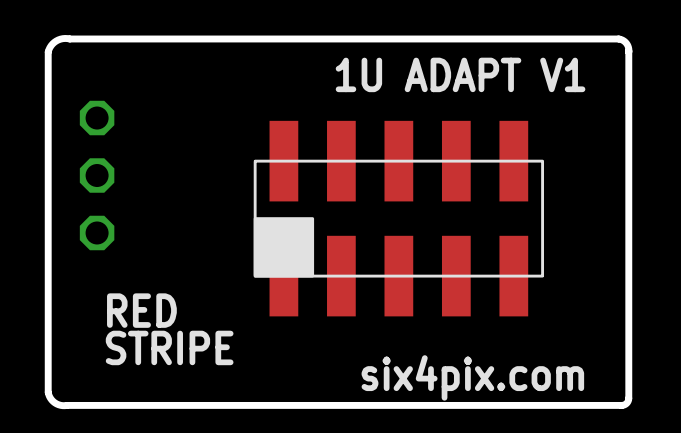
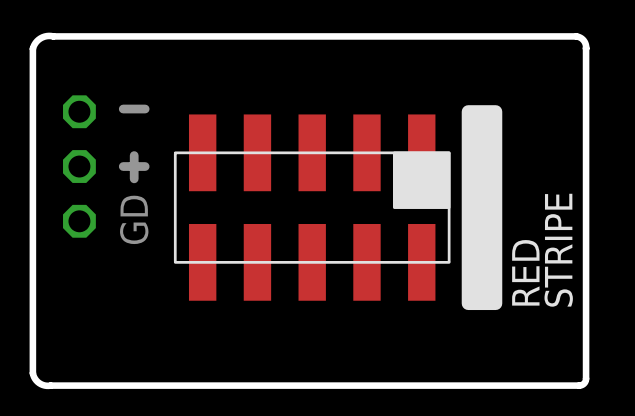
text: 1U ADAPT V1 (460, 74) -> none
drawing: none -> [461, 105, 503, 311]
line: none -> (123, 109) (145, 109)
line: none -> (134, 155) (134, 178)
line: none -> (123, 166) (145, 166)
part rotation: 0° (398, 218) -> 180° (312, 207)
text: none -> GD (134, 219)
text rotation: 0° (141, 310) -> 90° counterclockwise (525, 272)
text position: RED (141, 310) -> RED (525, 272)
text rotation: 0° (169, 347) -> 90° counterclockwise (558, 250)
text position: STRIPE (169, 347) -> STRIPE (558, 250)
text: six4pix.com (472, 377) -> none

